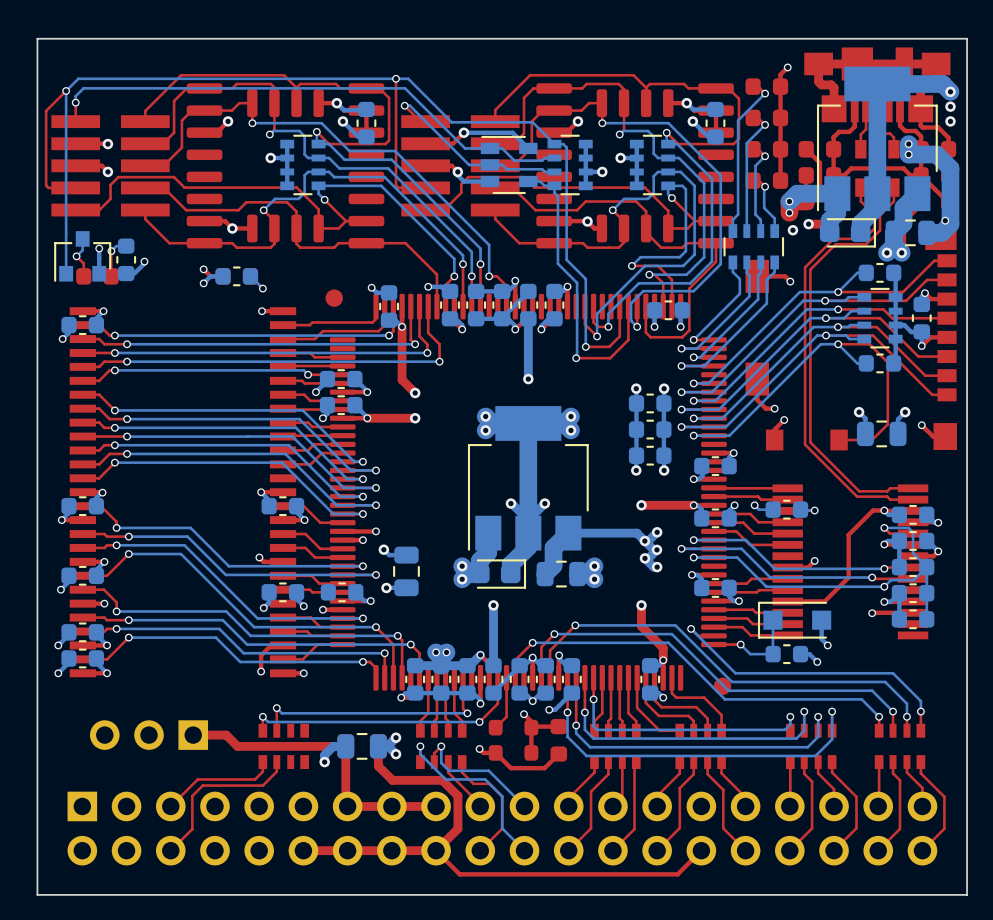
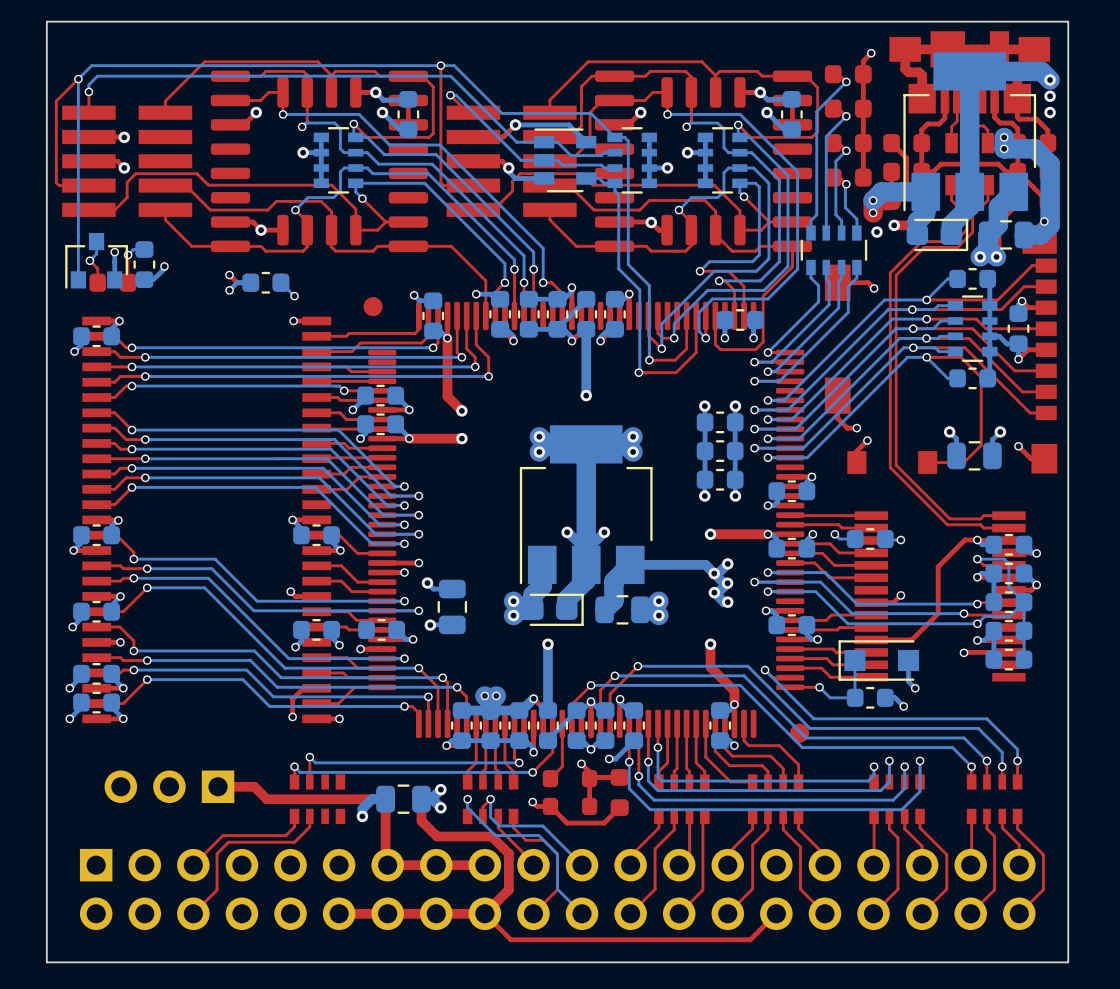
top track: (204, 88) (186, 88) (174, 101) (174, 132) (163, 143) (145, 143) -> none
top track: (204, 110) (191, 110) (181, 120) (181, 147) (163, 165) (145, 165) -> none

